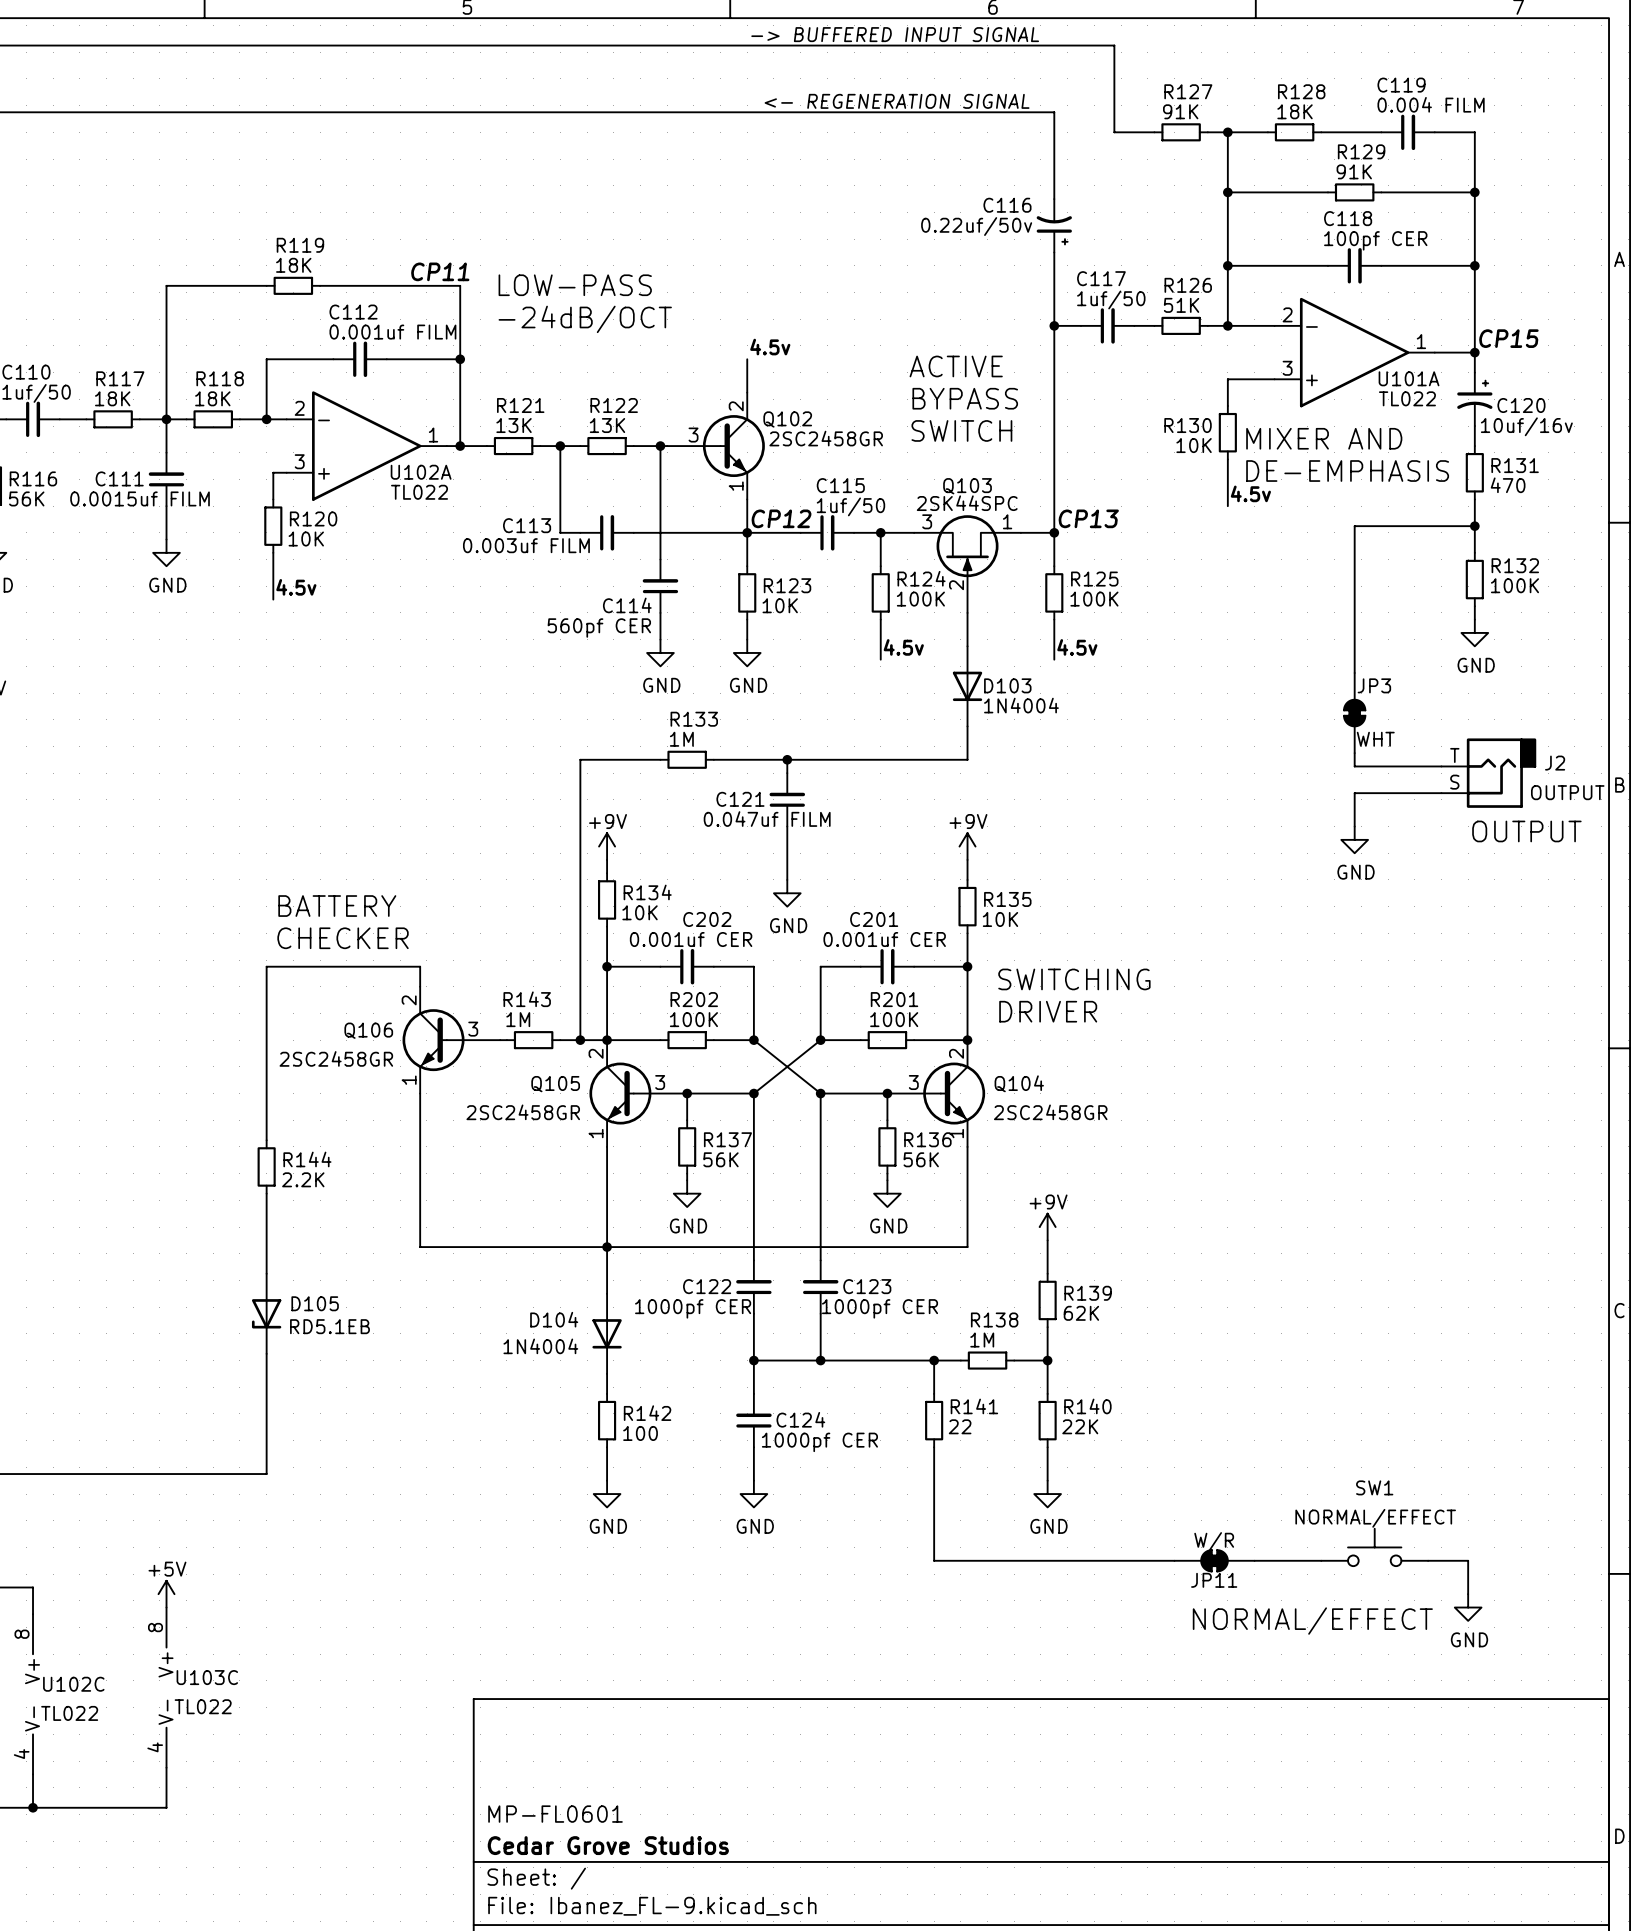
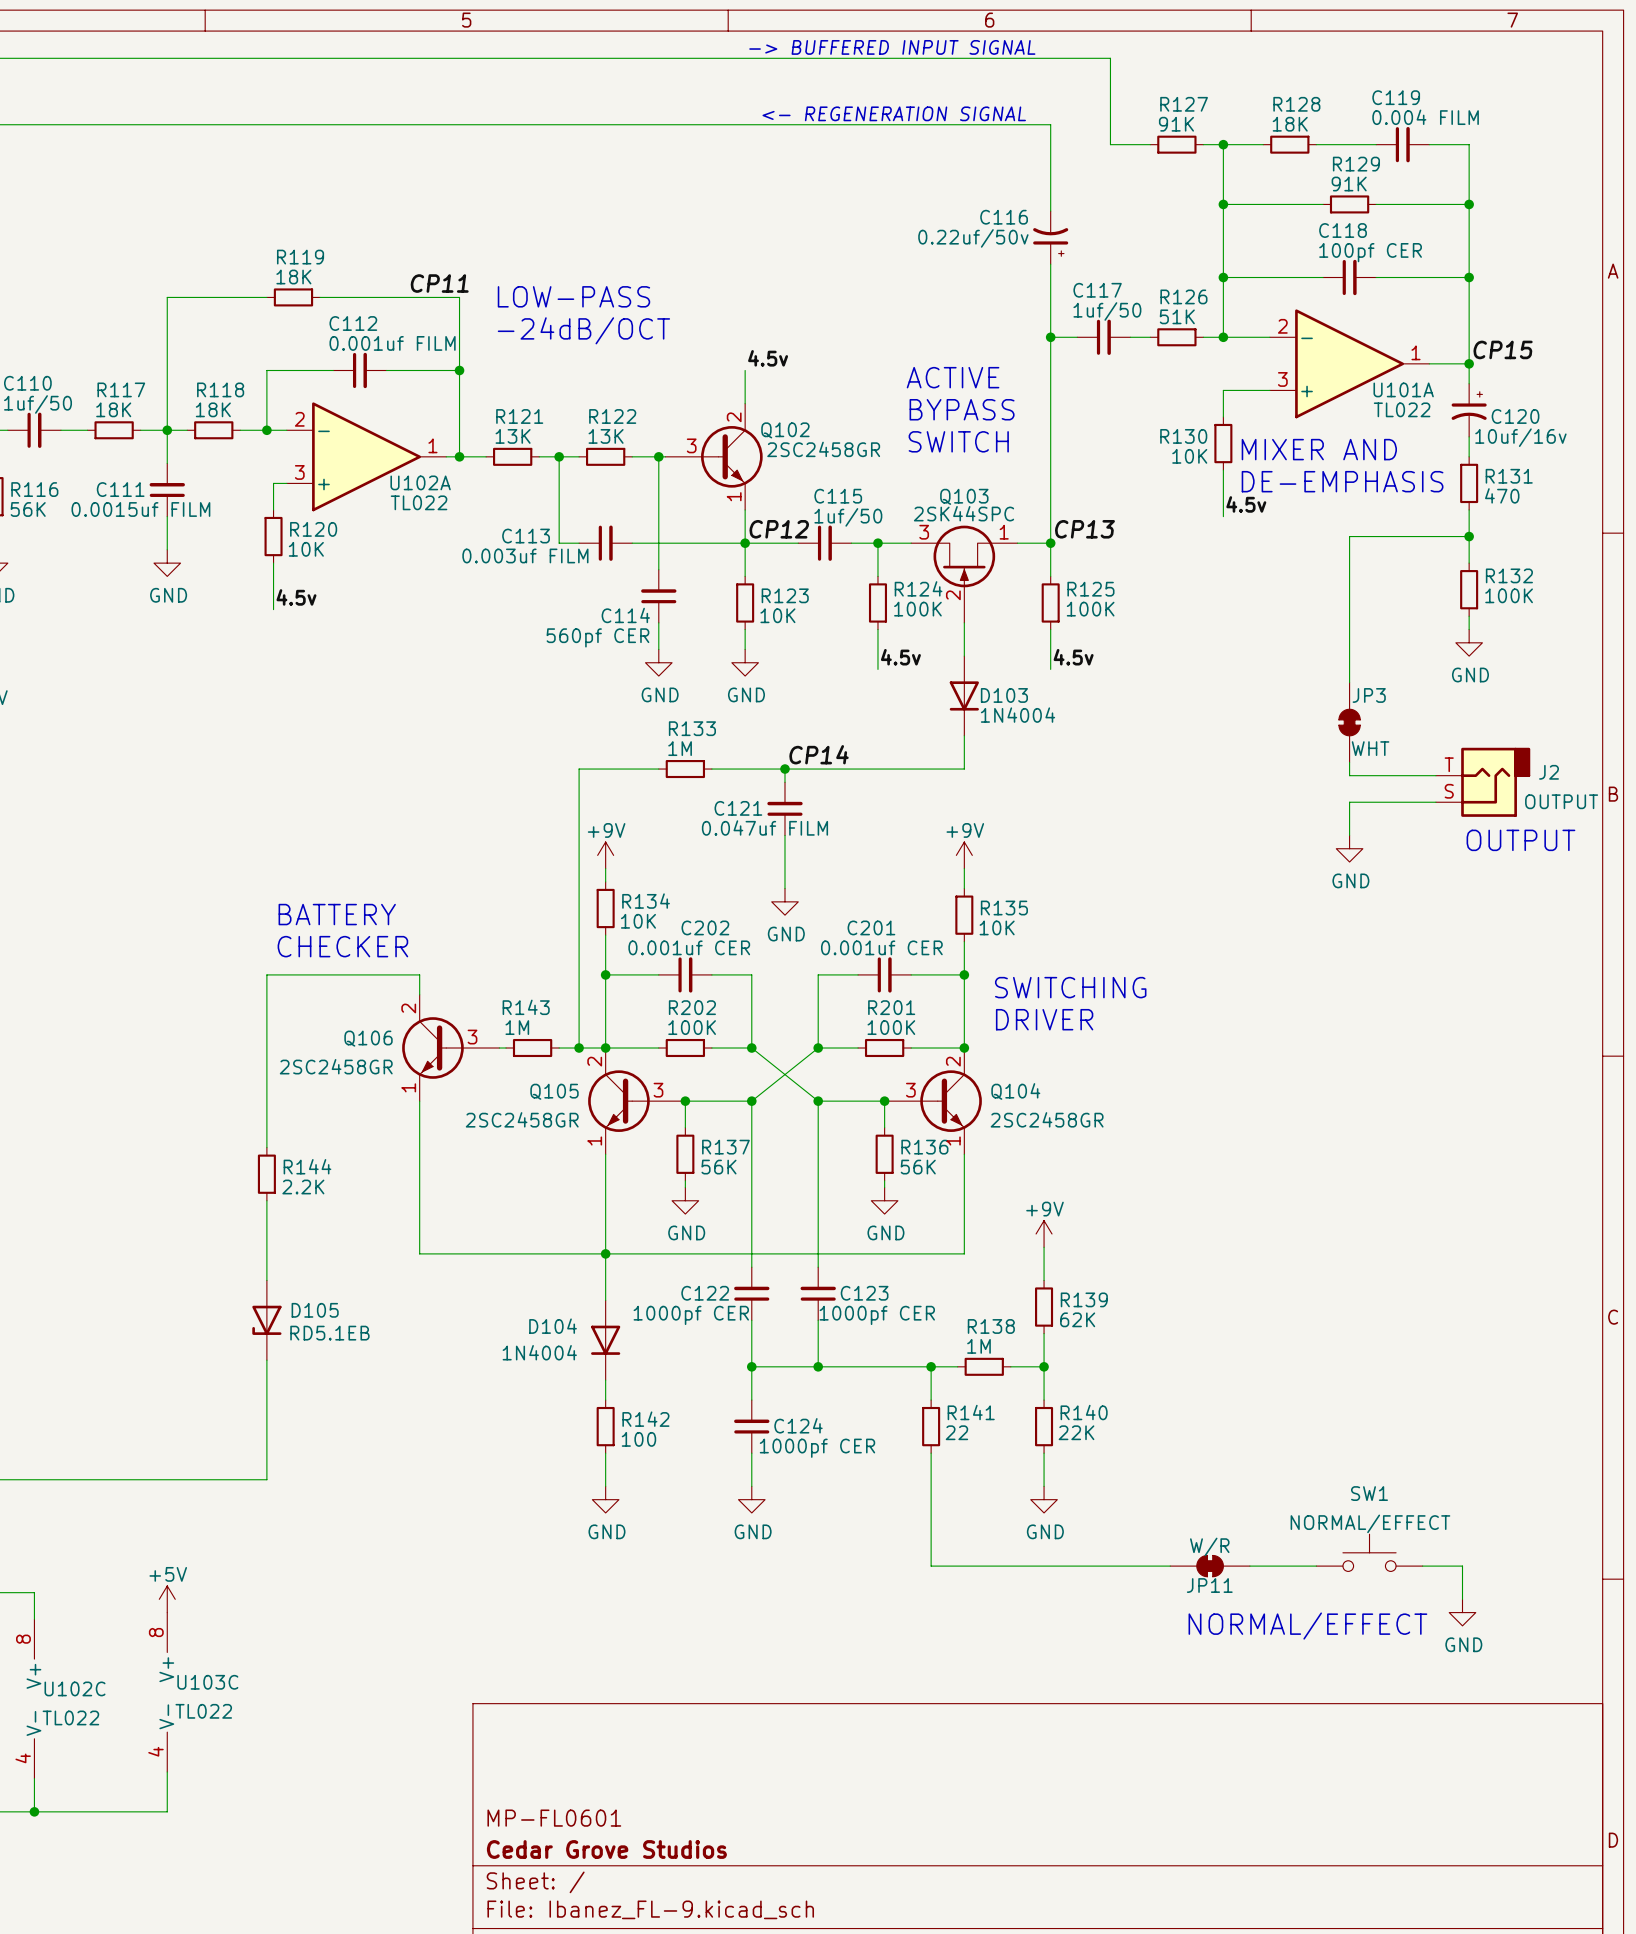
label: none -> CP14 (819, 754)

